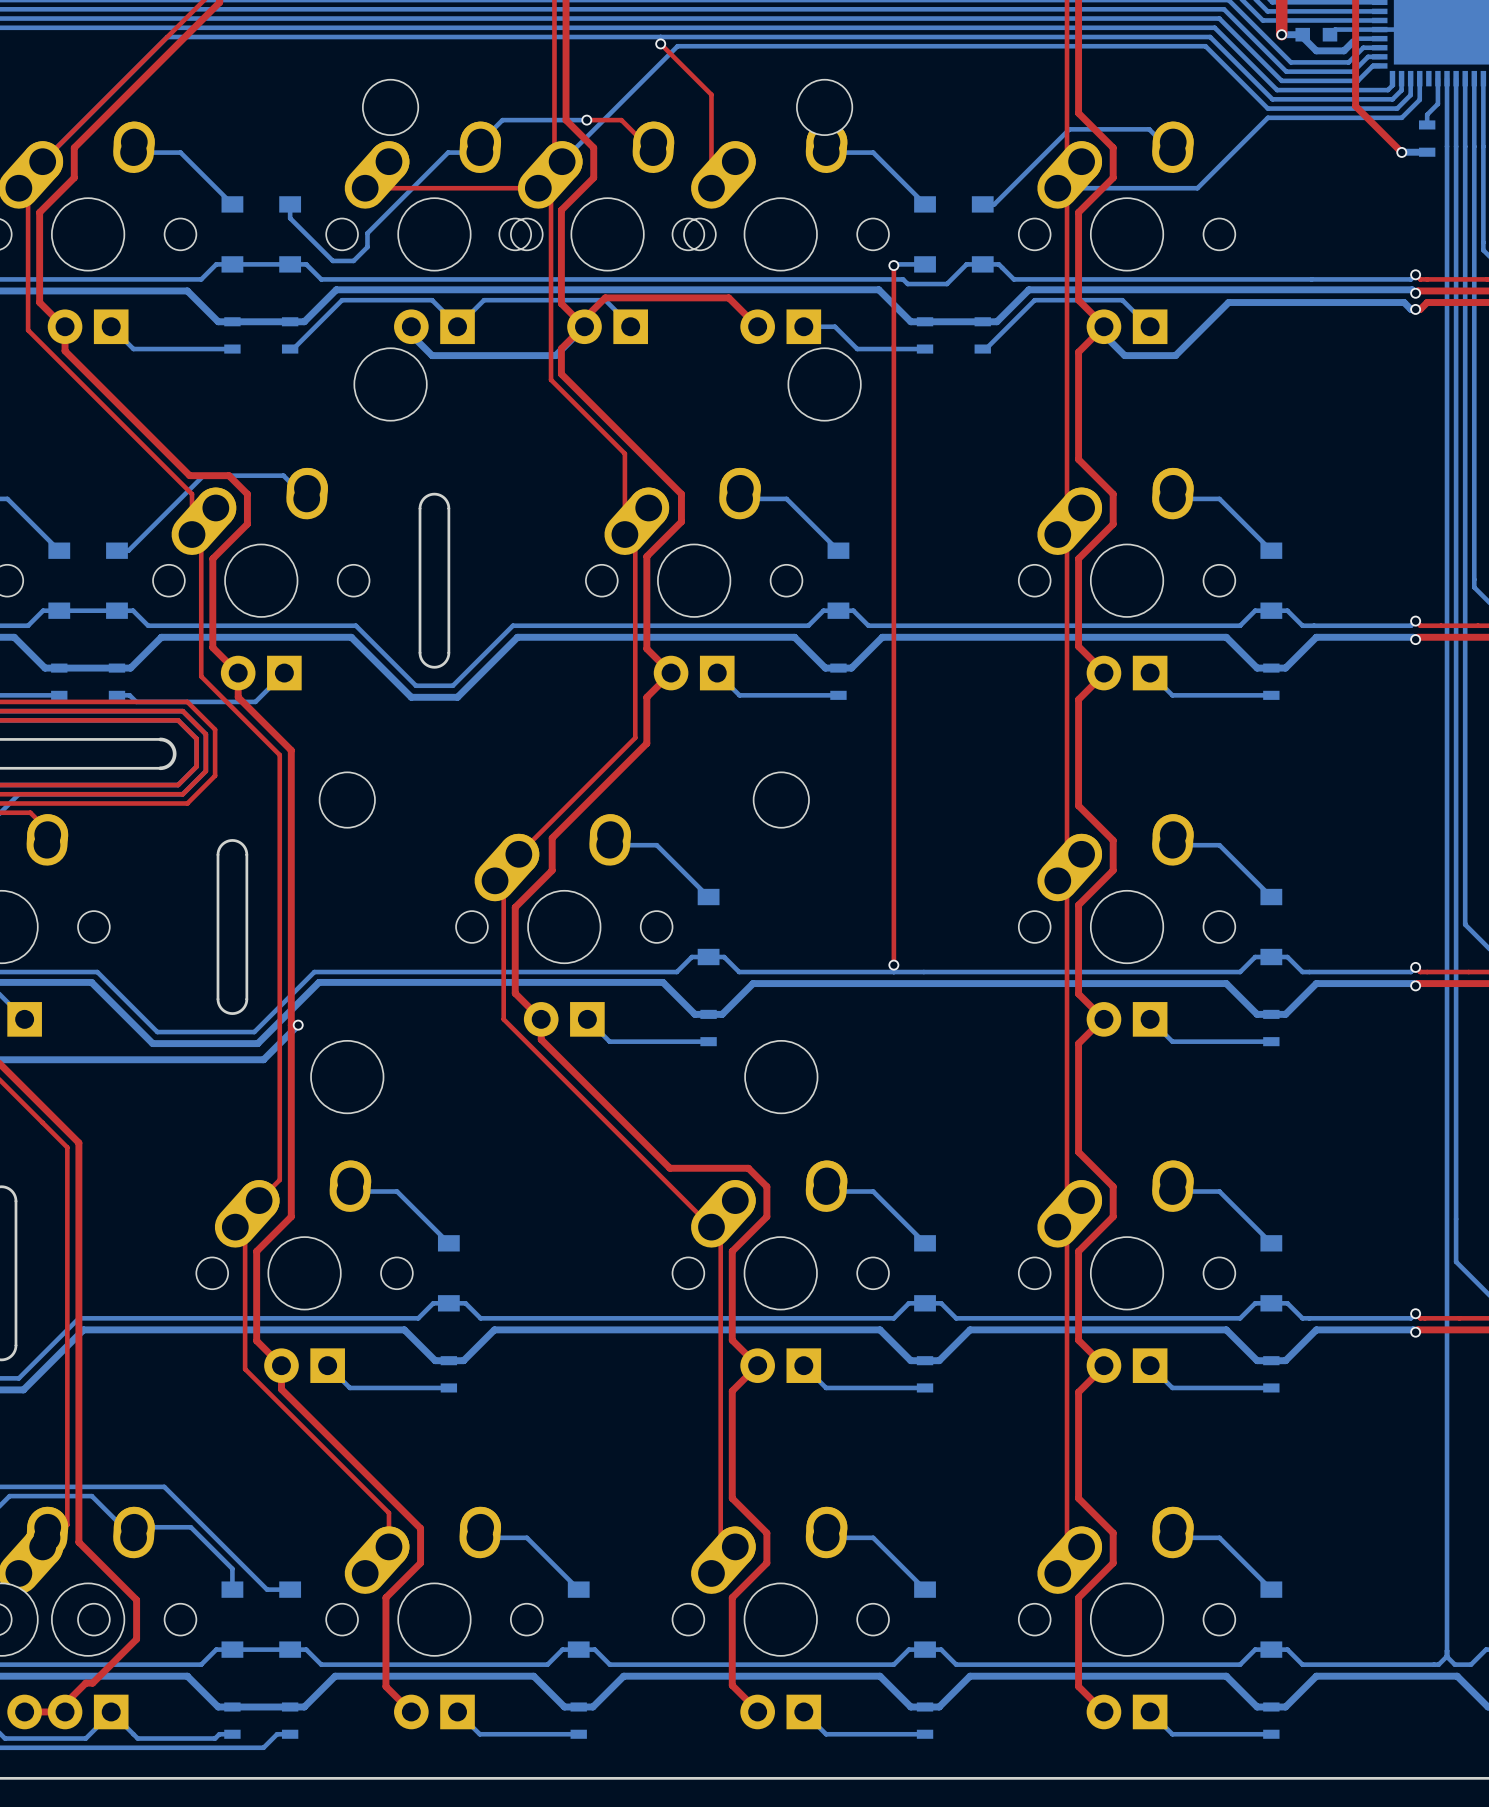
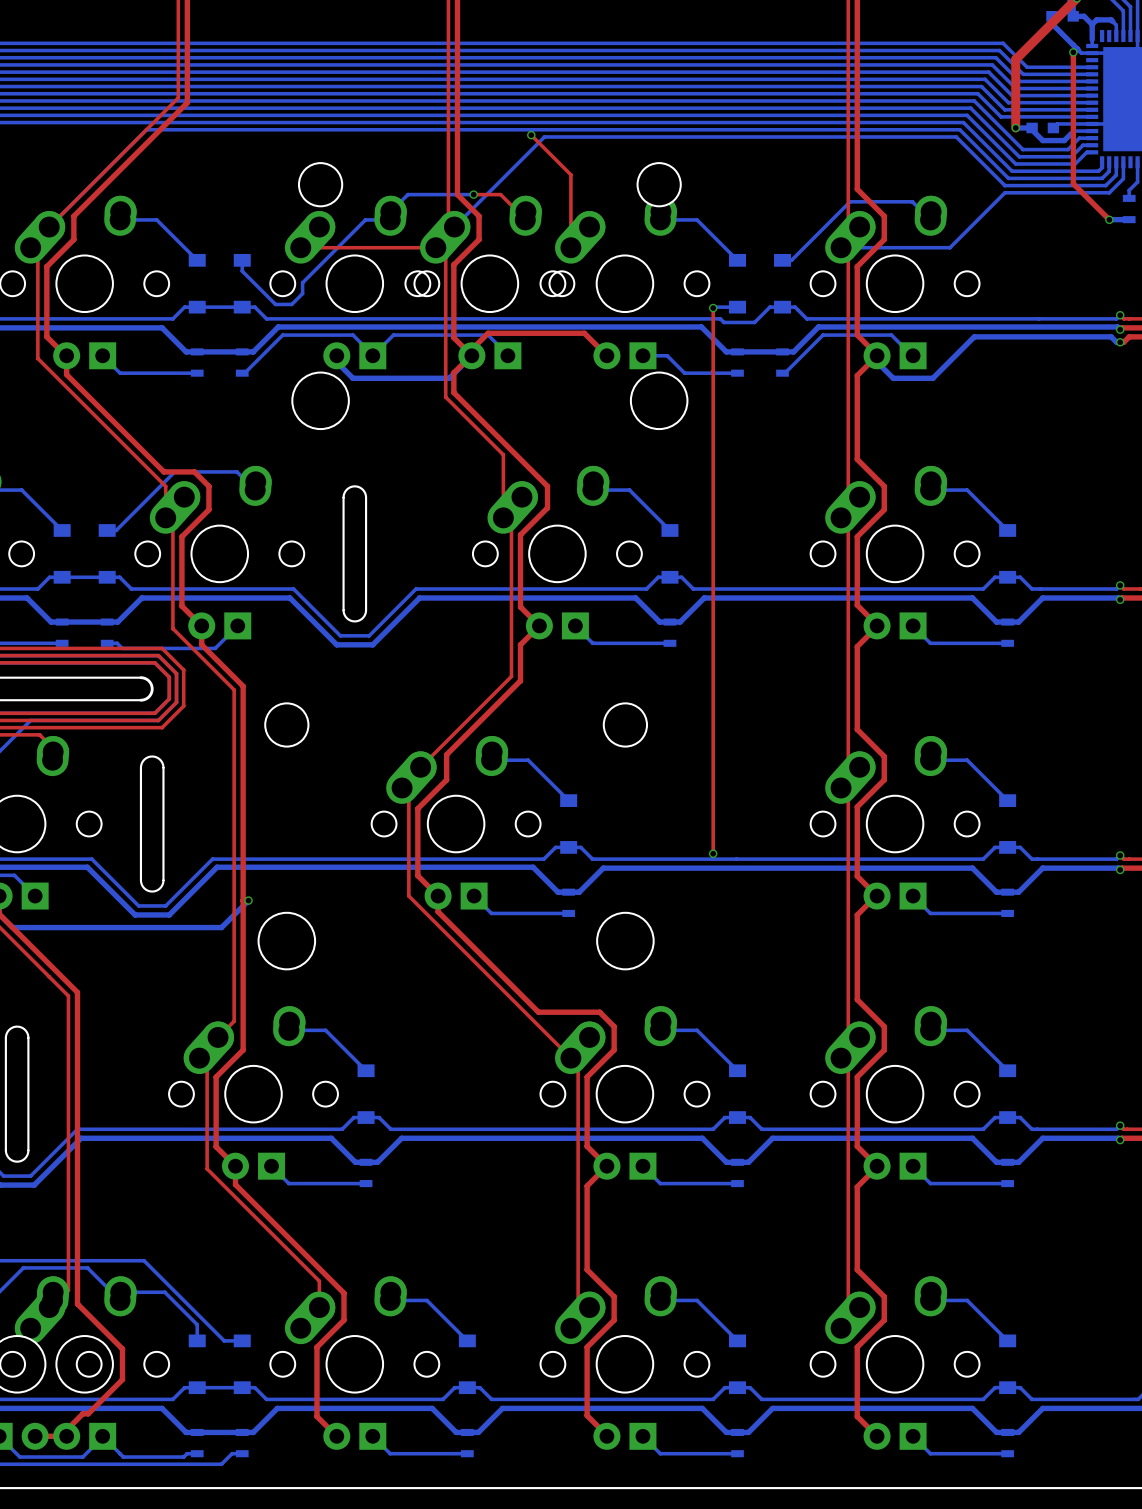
board edge: (217, 854) (218, 1001) (223, 1010) (234, 1013) (242, 1009) (246, 1001) (246, 852) (241, 843) (232, 840) (222, 844) (217, 854) -> (140, 767) (141, 881) (145, 889) (153, 891) (160, 888) (163, 881) (163, 766) (159, 758) (152, 756) (144, 759) (140, 767)
bottom track: (314, 972) (254, 1032) (192, 1032) -> (261, 859) (212, 859) (165, 905)
bottom track: (319, 982) (257, 1043) (196, 1043) -> (264, 867) (217, 867) (169, 914)

